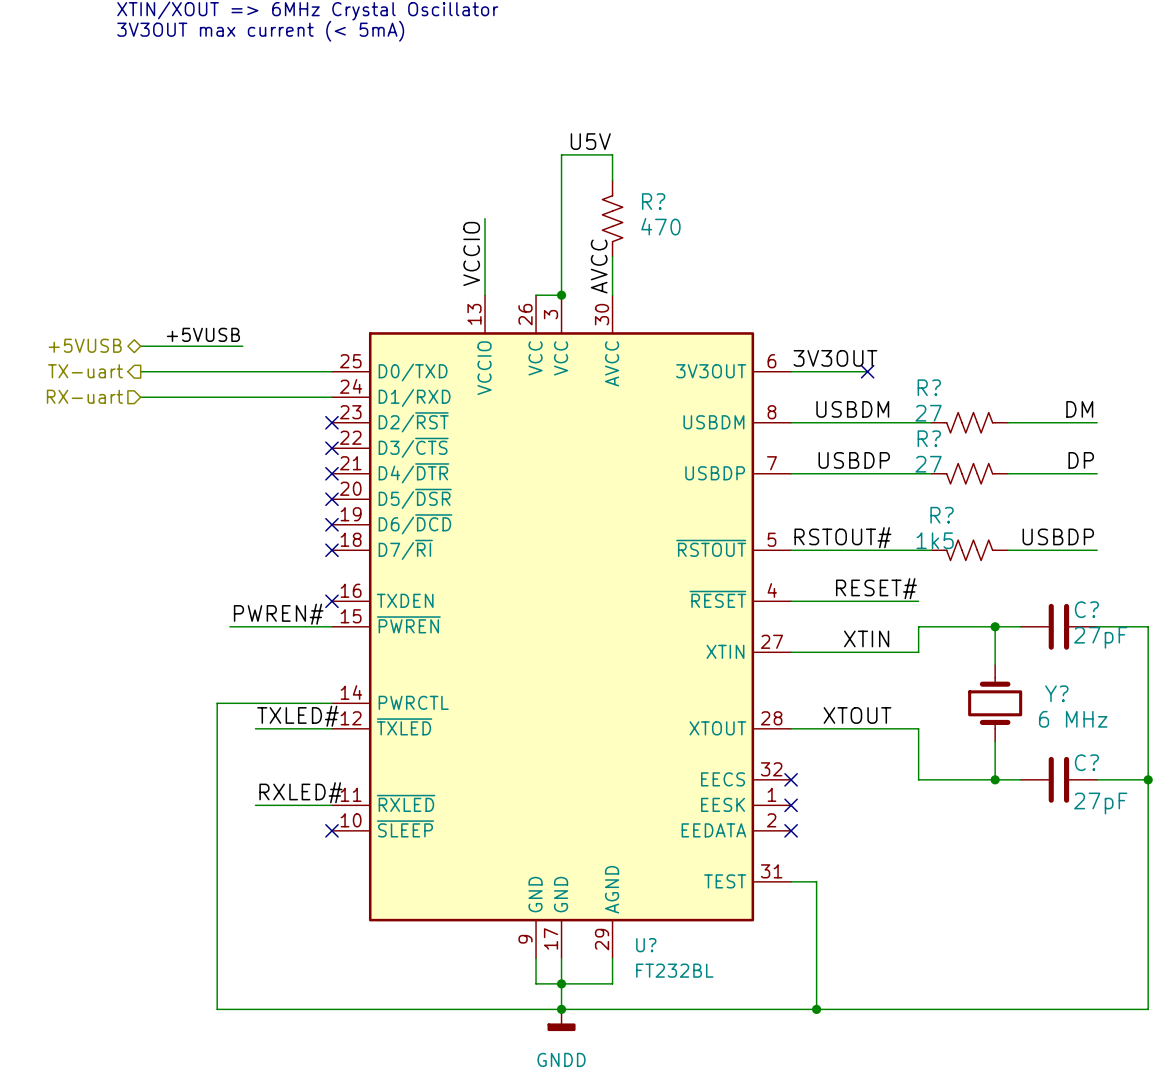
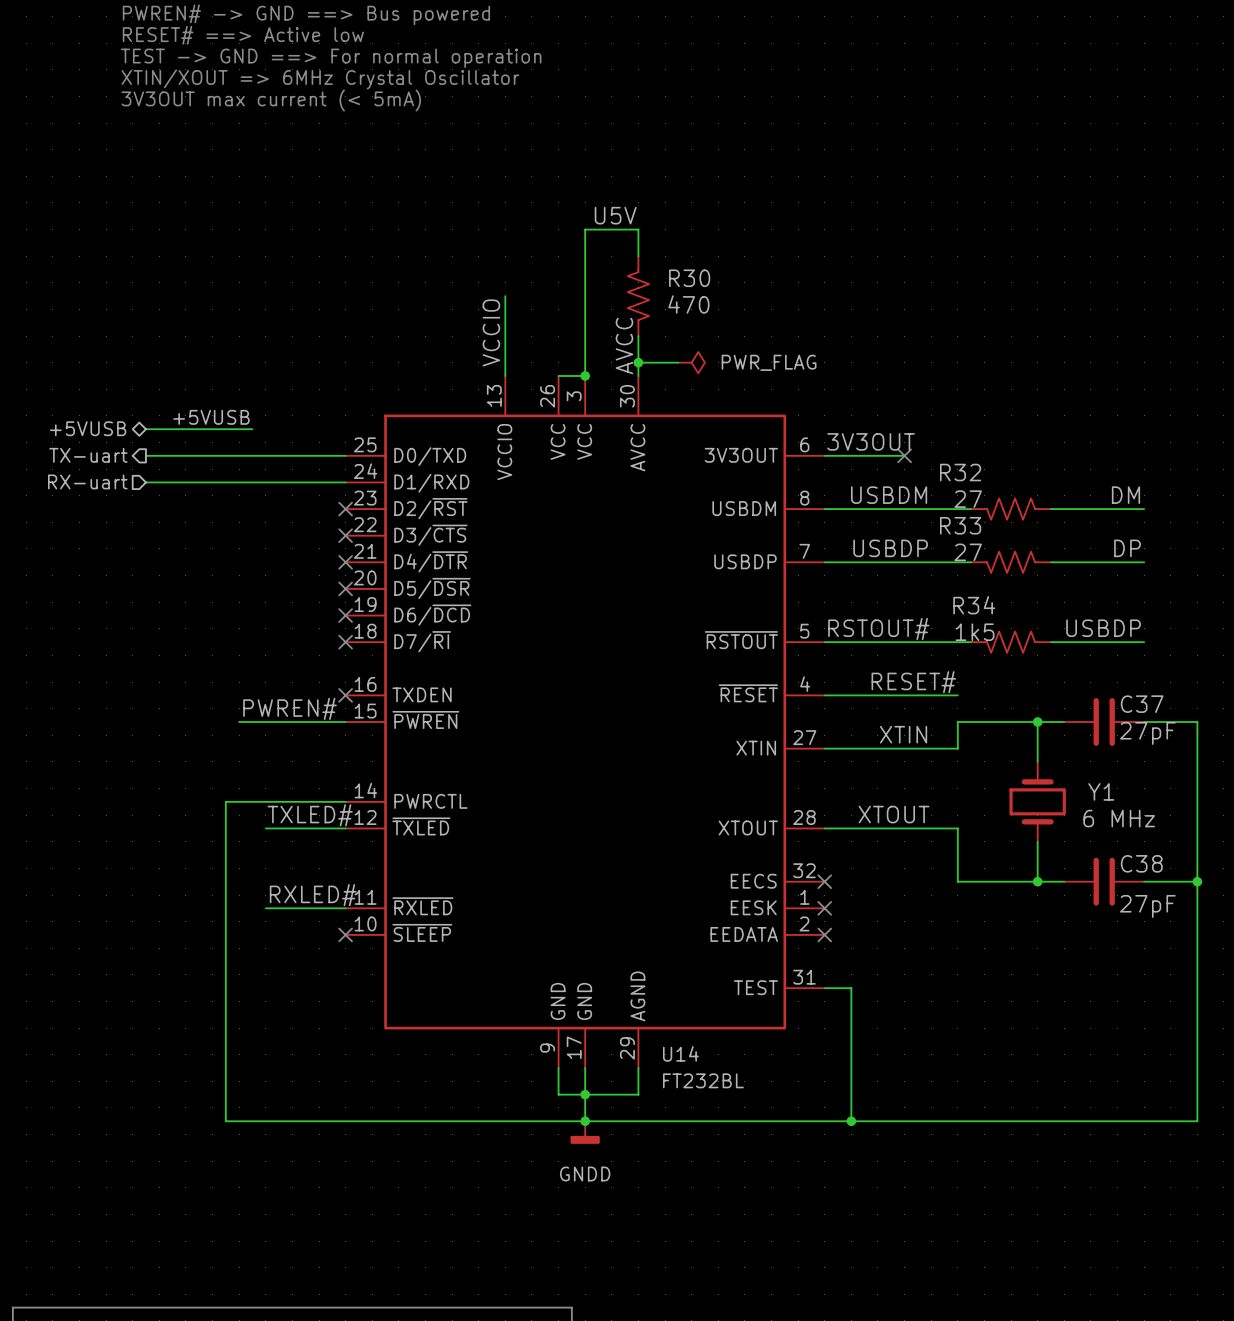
R? name: R? (653, 201) -> R30 (689, 278)
wire: none -> (638, 362) (678, 362)
junction: none -> (638, 362)
power symbol: none -> PWR_FLAG (691, 362)
R? name: R? (929, 387) -> R32 (960, 472)
R? name: R? (929, 438) -> R33 (960, 525)
R? name: R? (942, 515) -> R34 (974, 605)
C? name: C? (1086, 609) -> C37 (1142, 704)
Y? name: Y? (1056, 693) -> Y1 (1101, 791)
C? name: C? (1086, 762) -> C38 (1141, 863)
U? name: U? (646, 945) -> U14 (680, 1053)

